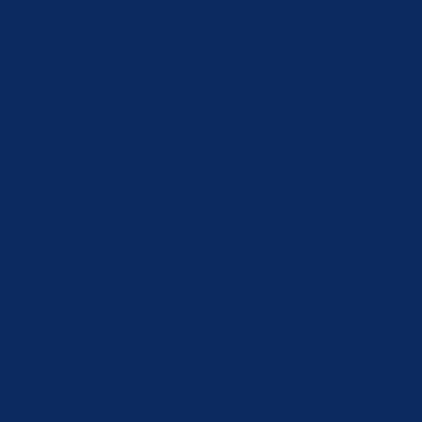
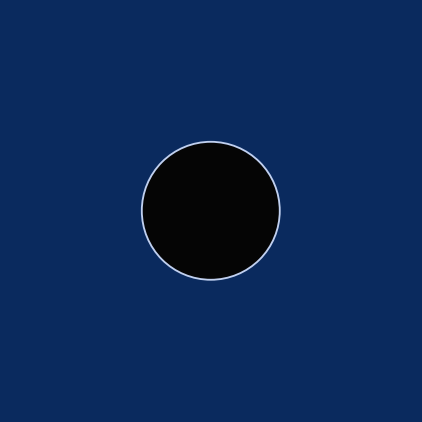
part: none -> (210, 210)

